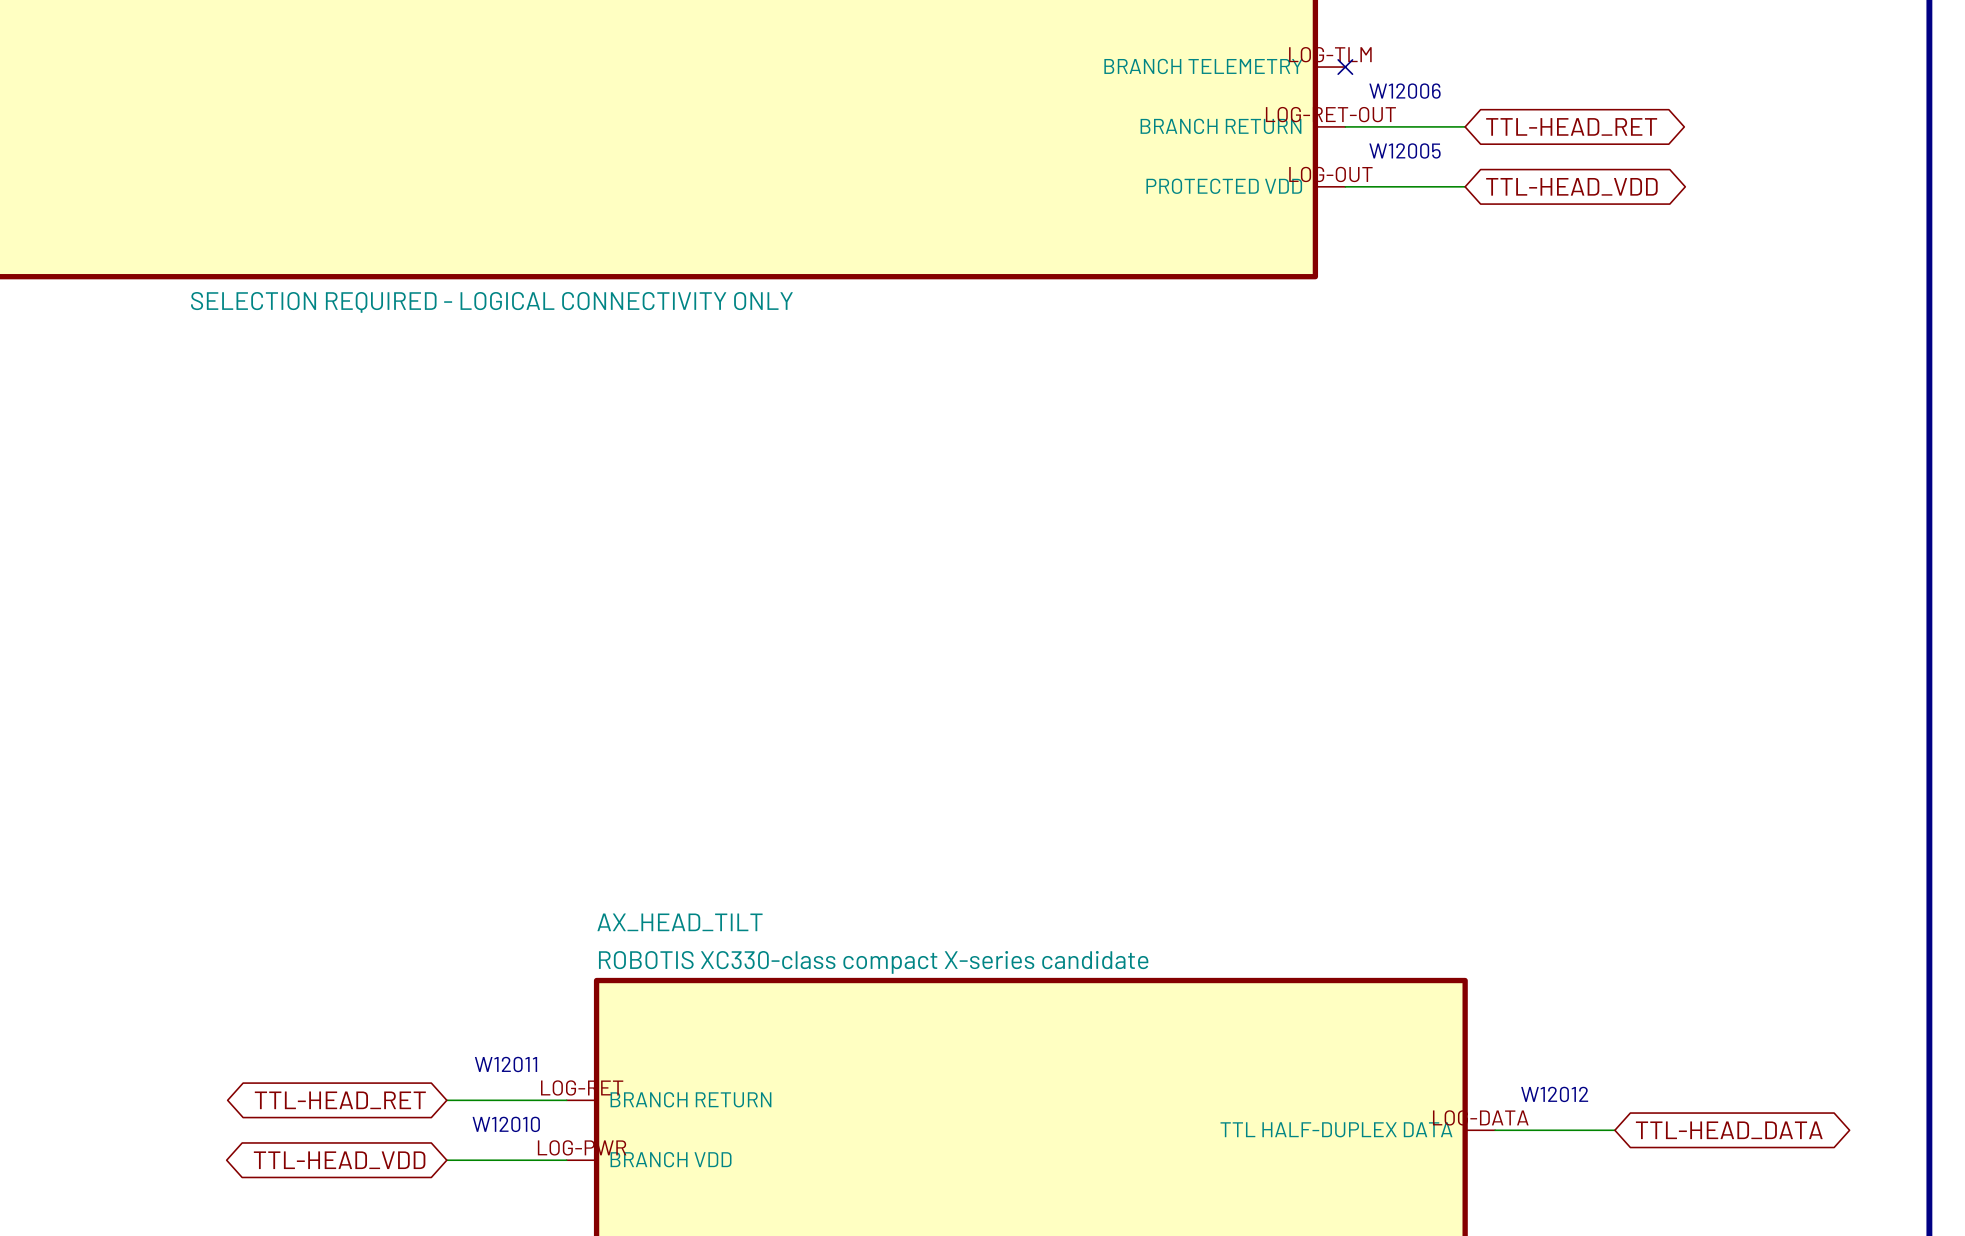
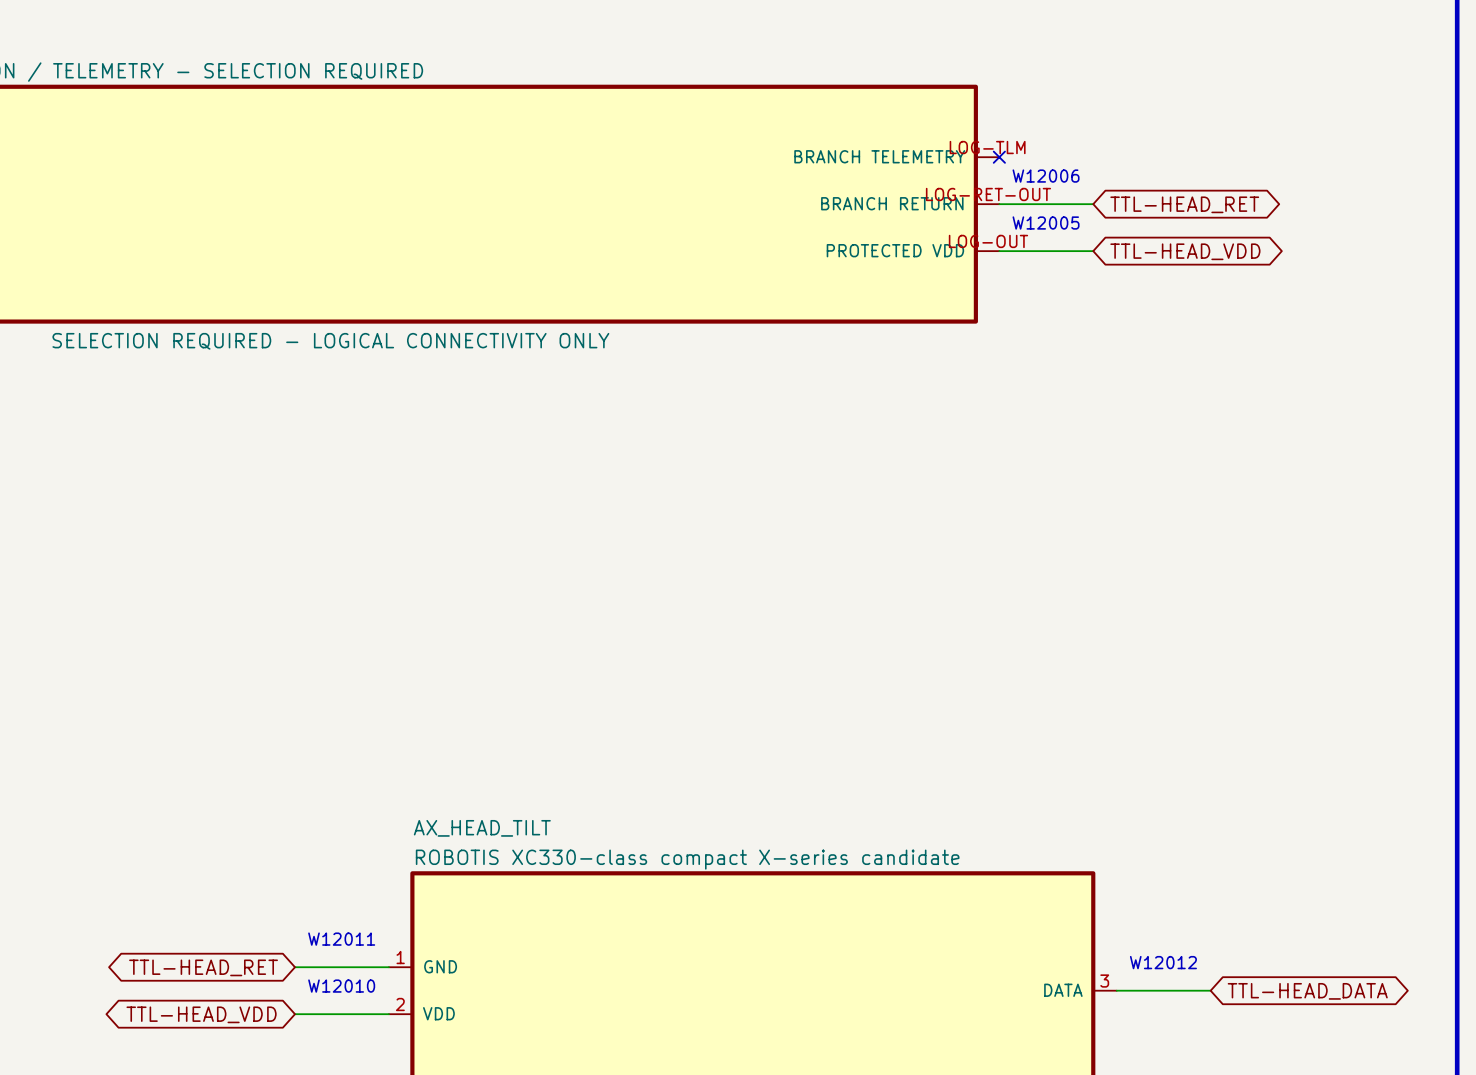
AX_HEAD_TILT pin number: LOG-RET (582, 1087) -> 1 (400, 957)
AX_HEAD_TILT pin name: BRANCH RETURN (690, 1099) -> GND (440, 966)
AX_HEAD_TILT pin number: LOG-DATA (1480, 1117) -> 3 (1104, 981)
AX_HEAD_TILT pin name: TTL HALF-DUPLEX DATA (1336, 1129) -> DATA (1063, 990)
AX_HEAD_TILT pin number: LOG-PWR (582, 1147) -> 2 (400, 1004)
AX_HEAD_TILT pin name: BRANCH VDD (671, 1159) -> VDD (438, 1013)

